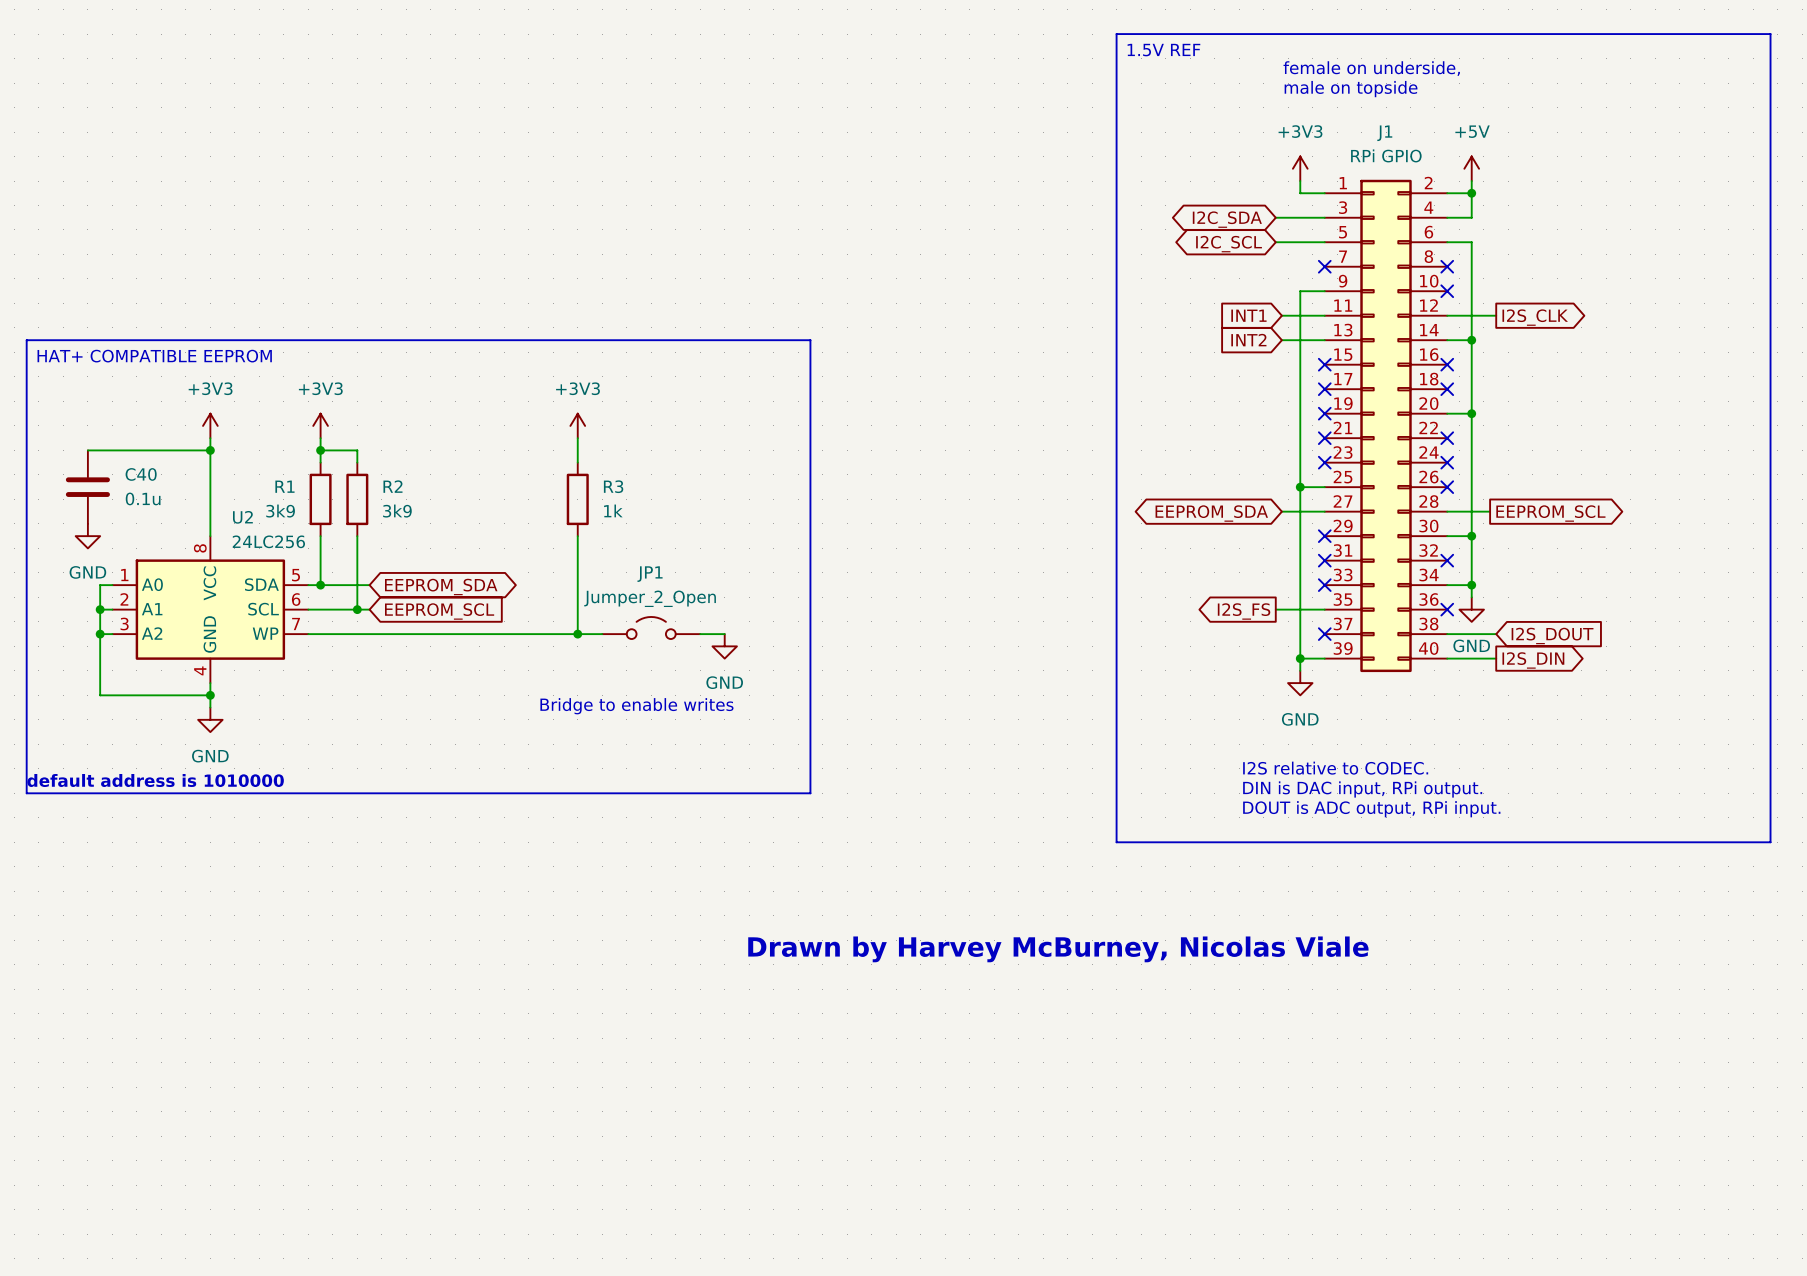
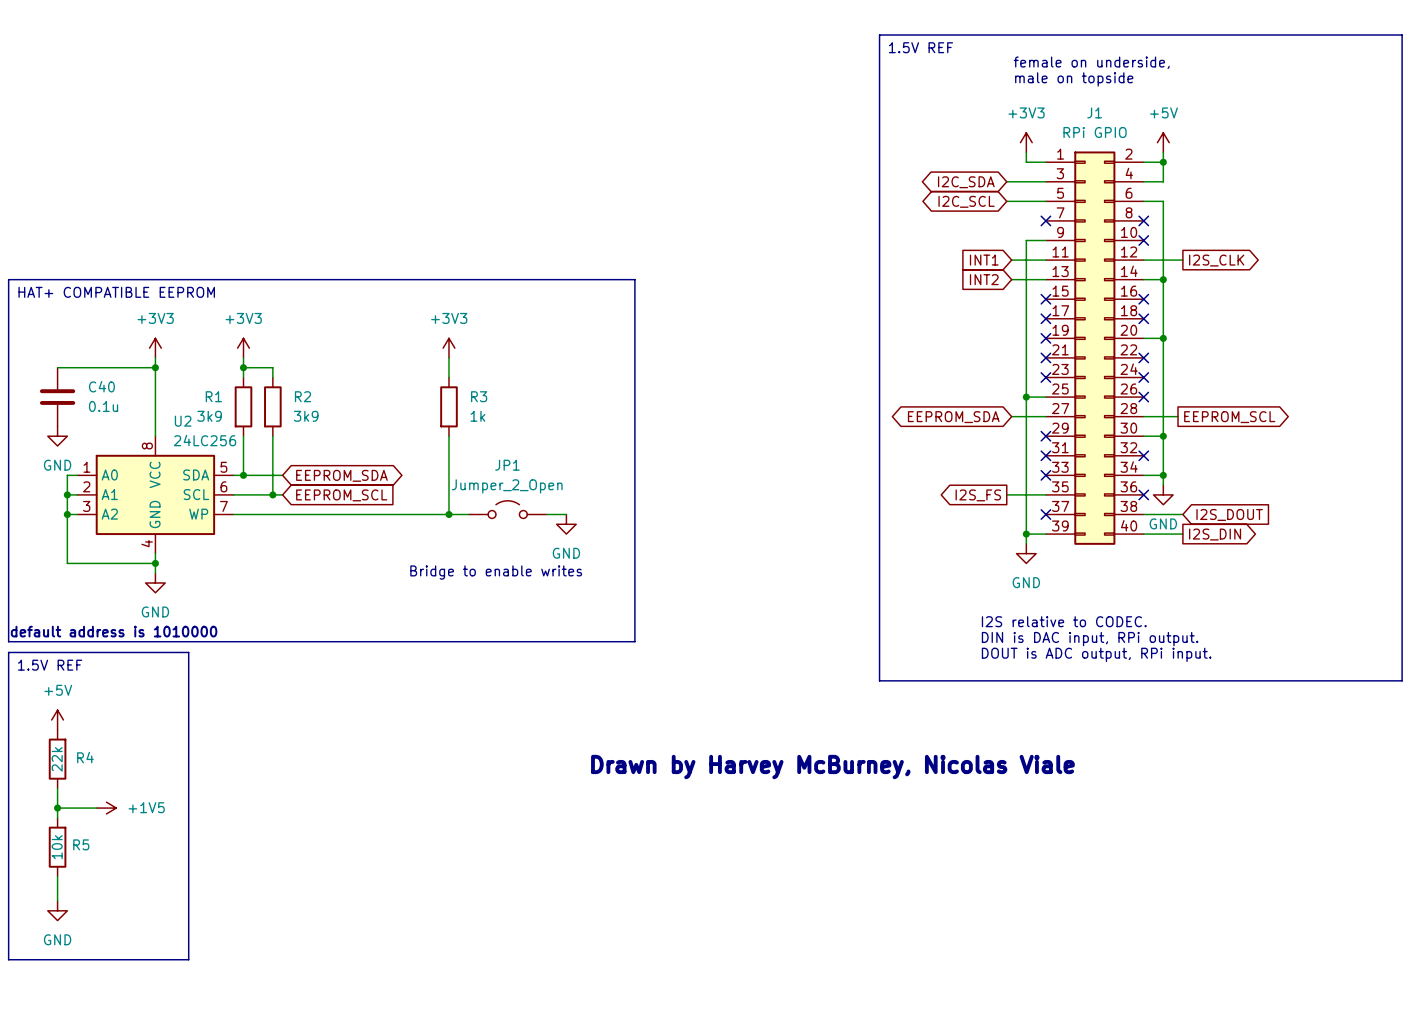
line: none -> (8, 652) (188, 652) (188, 959) (8, 959) (8, 652)
text: none -> 1.5V REF (50, 665)
power symbol: none -> +5V (57, 719)
R4: none -> 22k (57, 759)
wire: none -> (57, 788) (57, 817)
wire: none -> (57, 808) (96, 808)
junction: none -> (57, 808)
power symbol: none -> +1V5 (106, 808)
R5: none -> 10k (57, 847)
wire: none -> (57, 876) (57, 901)
power symbol: none -> GND (57, 910)

